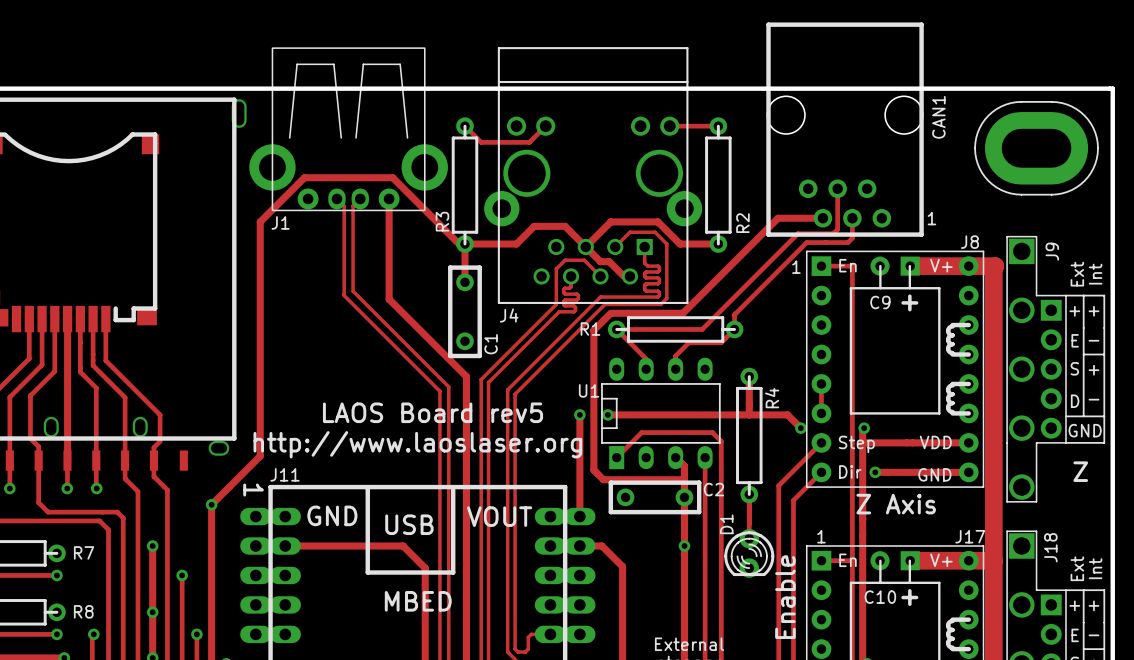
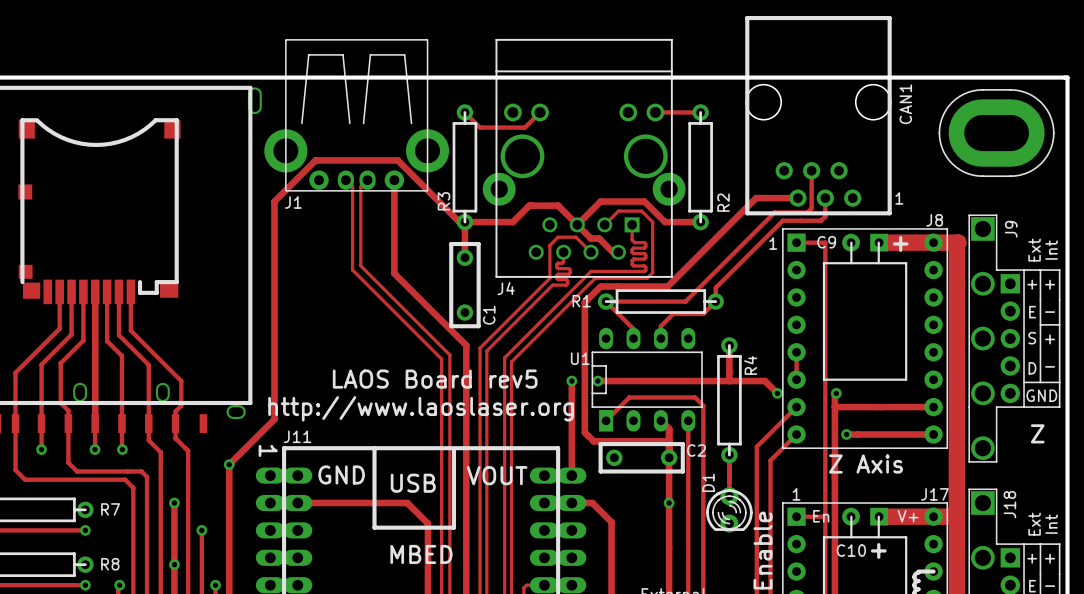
J8 footprint: [806, 250, 985, 488] -> [782, 228, 948, 449]
C9 name position: C9 (880, 302) -> C9 (826, 242)
C9 text position: + (909, 302) -> + (900, 243)

